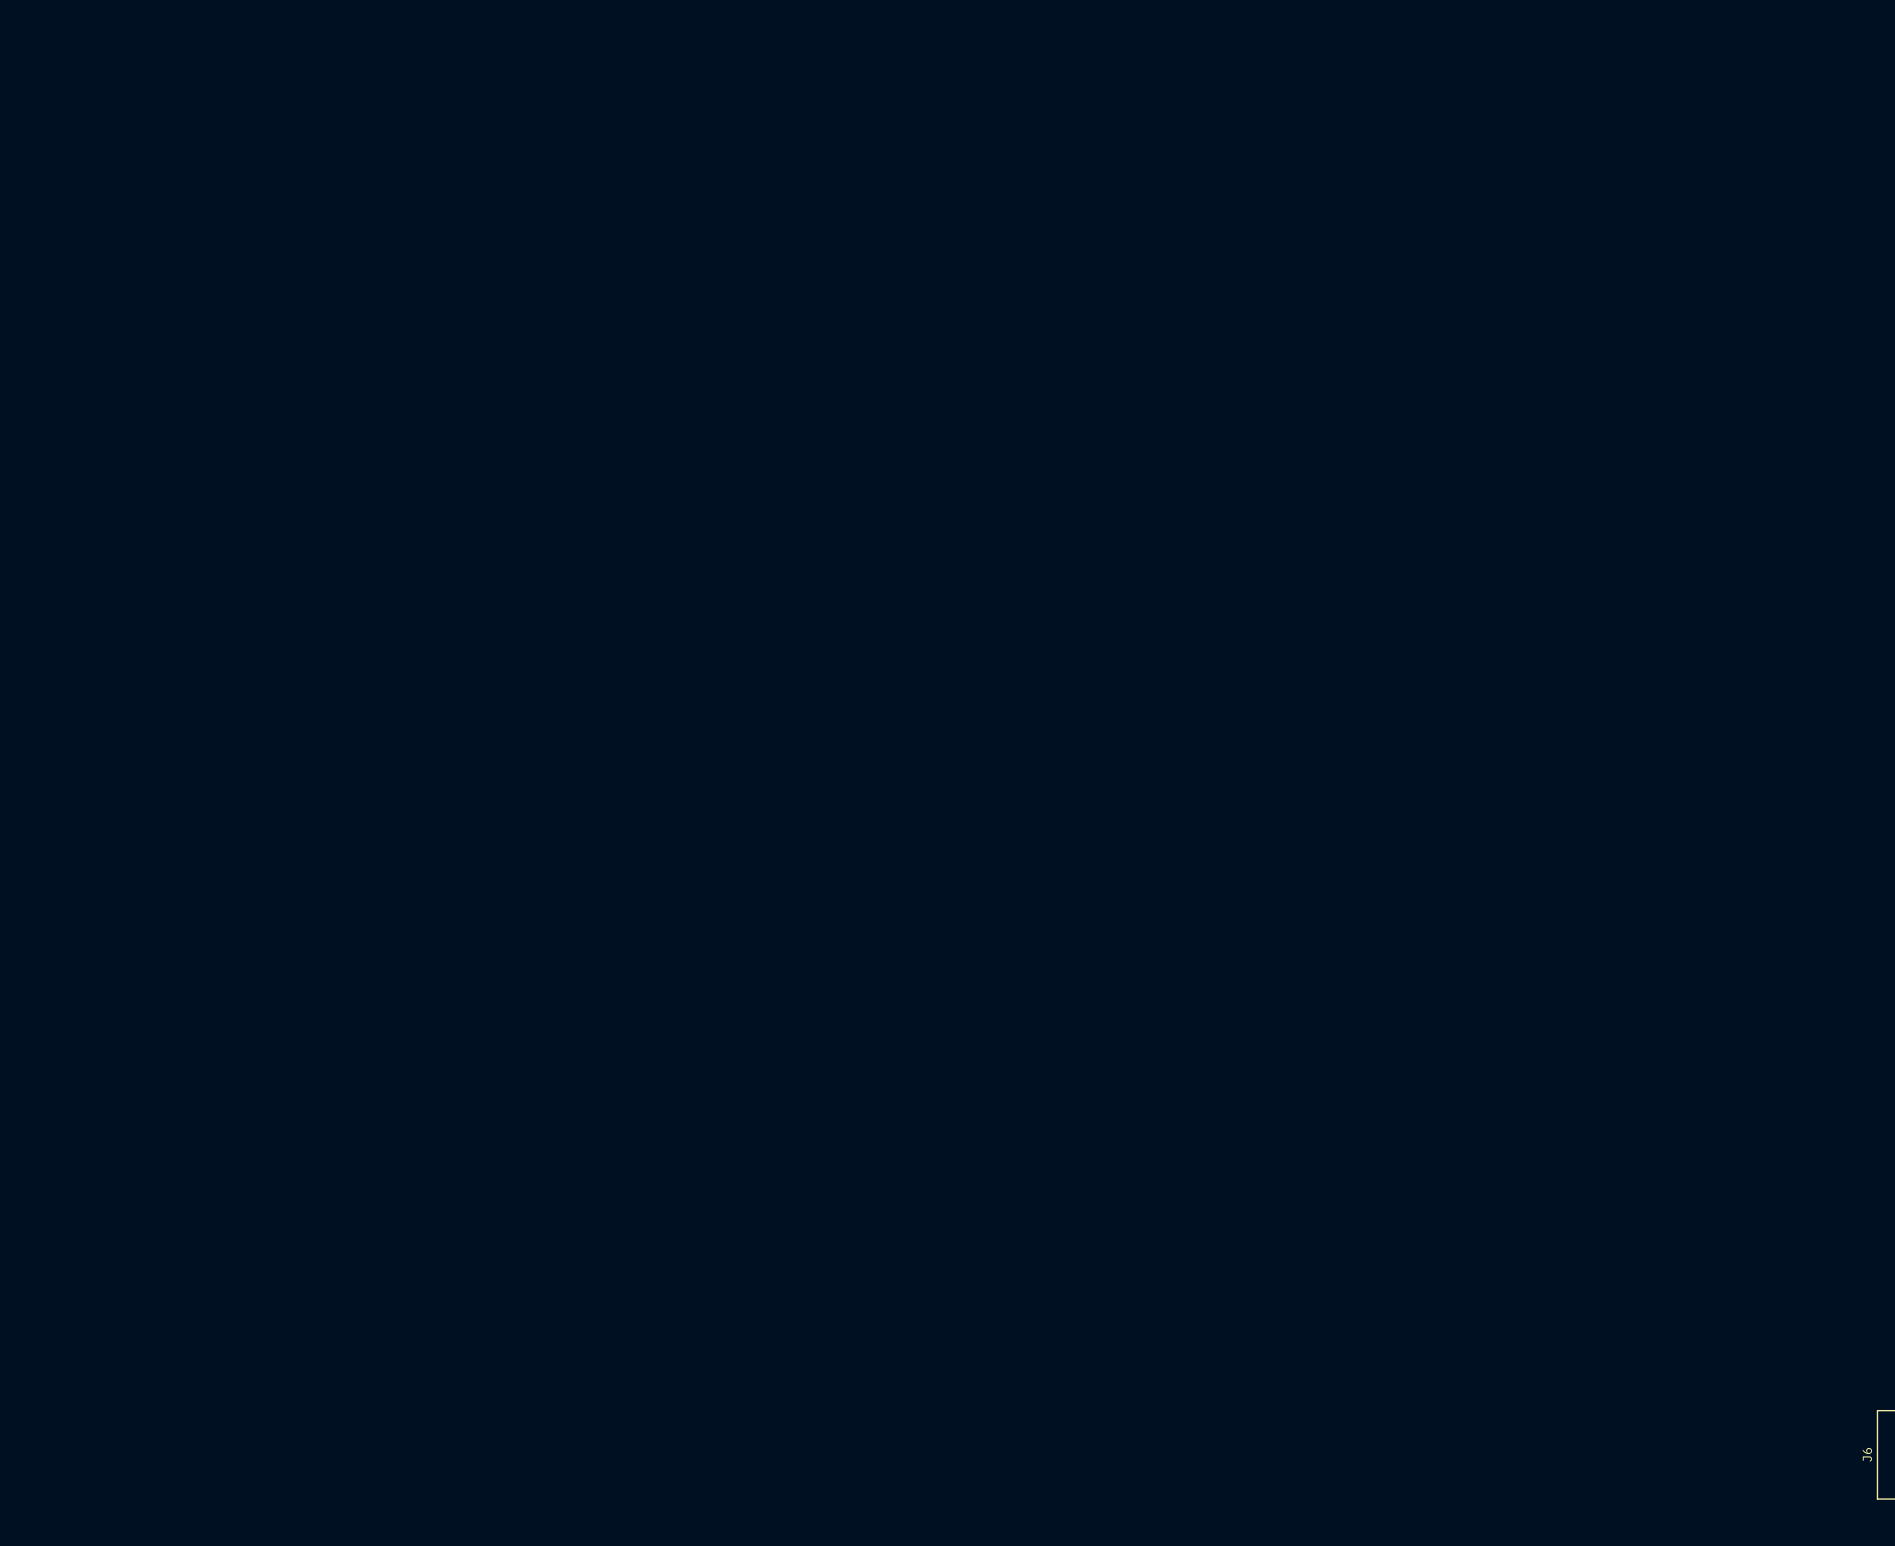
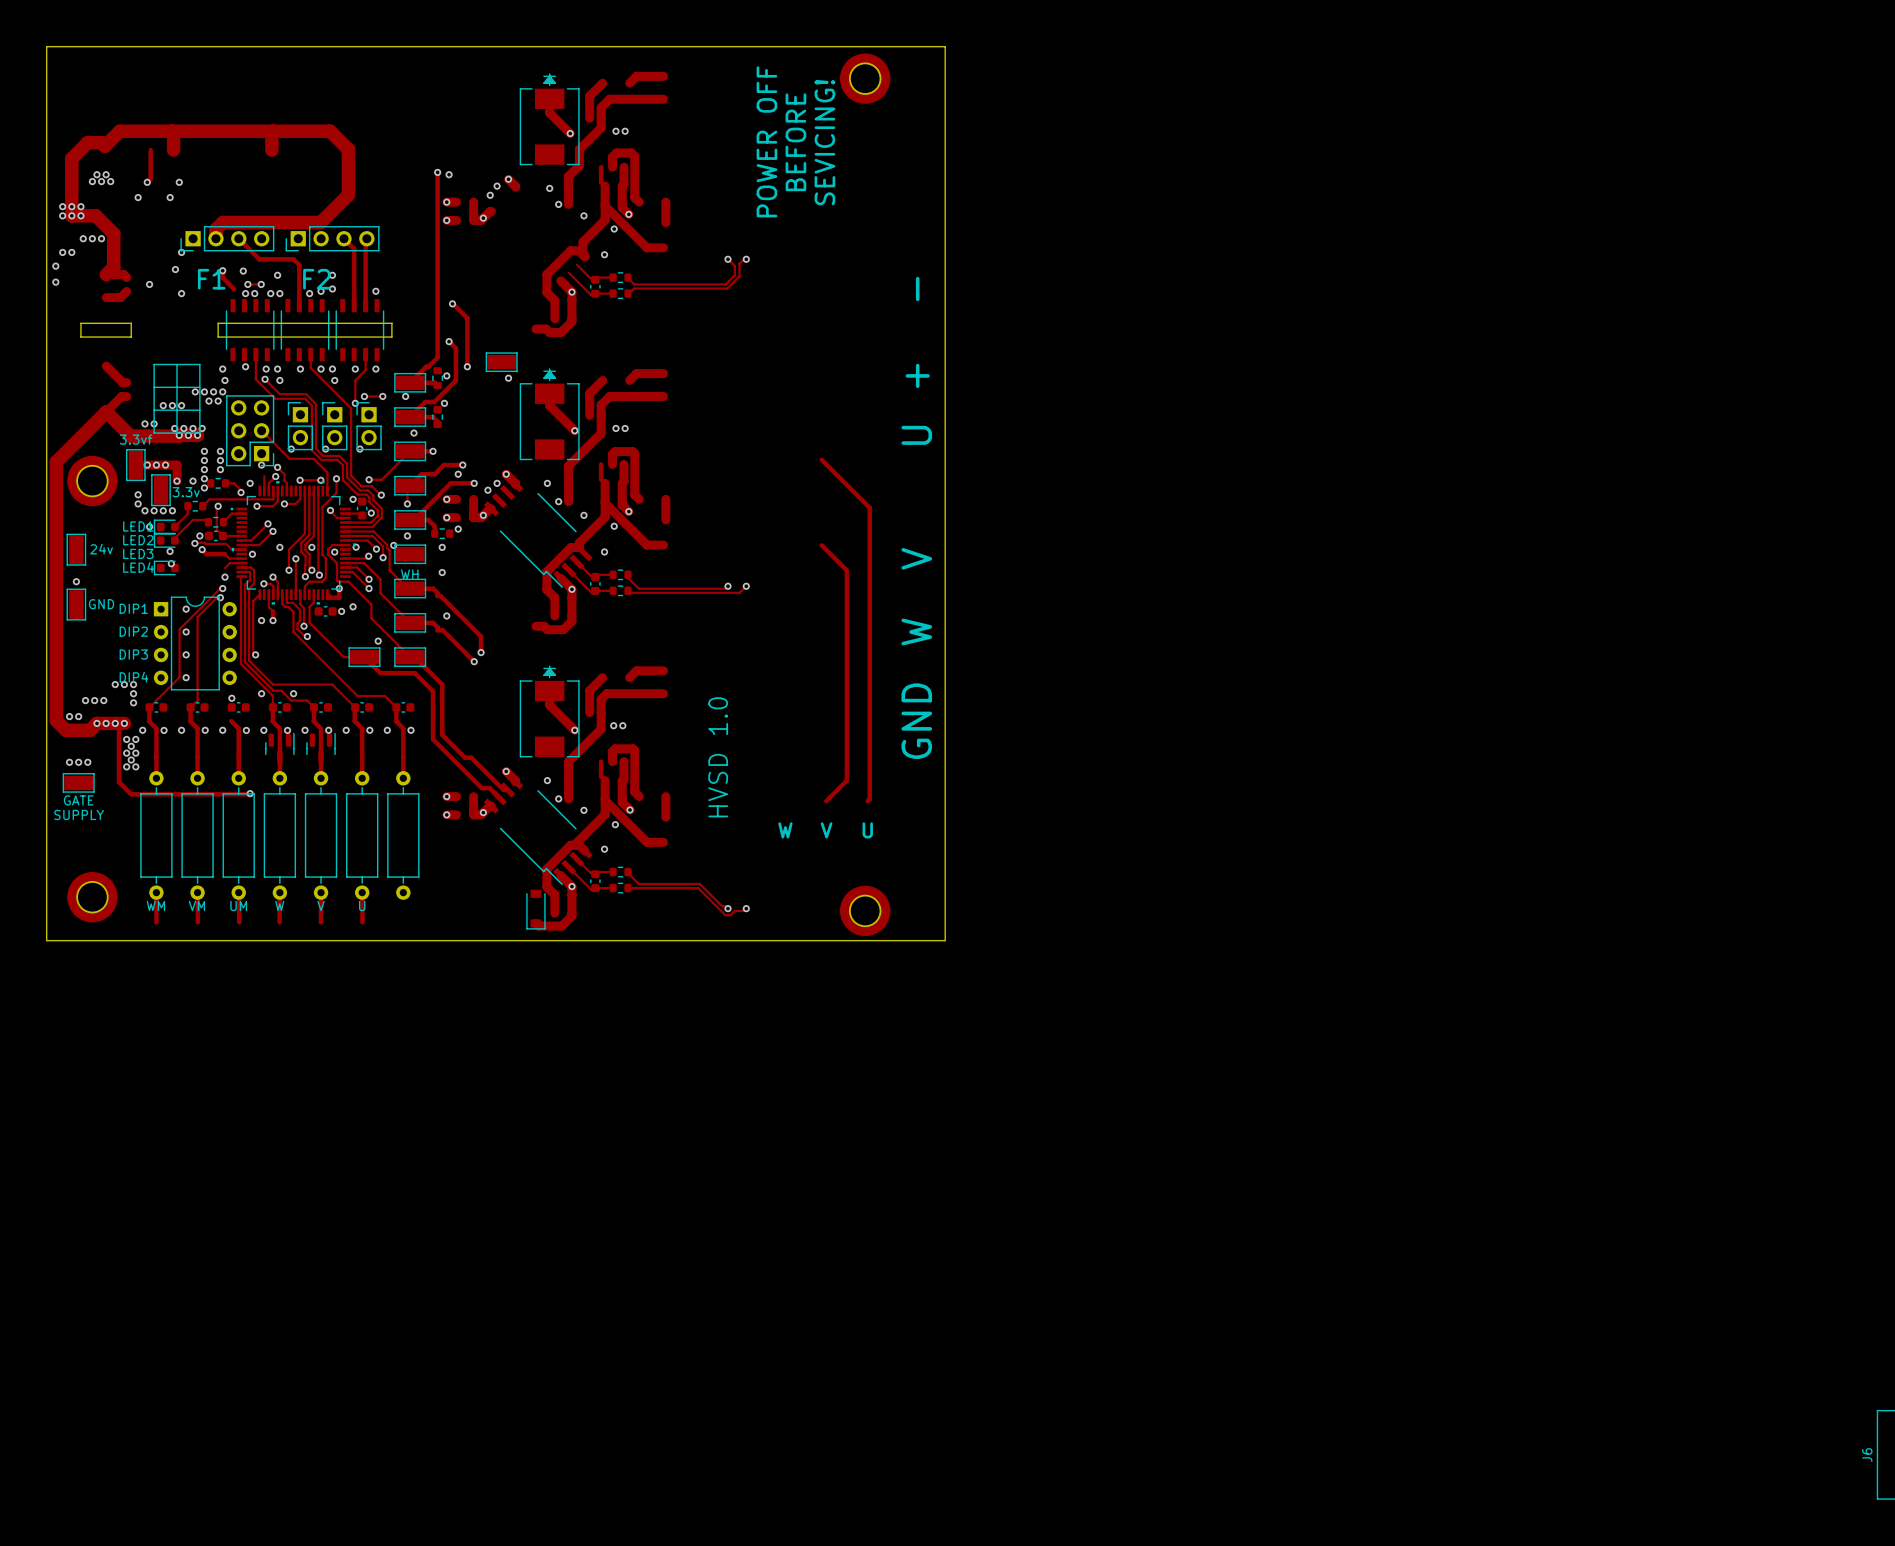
board edge: none -> (46, 46) (945, 46) (945, 940) (46, 940) (46, 46)
track: none -> (663, 76) (636, 76) (629, 83)
part: none -> (865, 78)
track: none -> (602, 83) (589, 96) (589, 118)
track: none -> (549, 98) (549, 112) (570, 133)
track: none -> (663, 99) (609, 99) (601, 107) (601, 127) (579, 149) (579, 165) (568, 176) (568, 204)
part: none -> (549, 119)
track: none -> (172, 131) (173, 150)
track: none -> (273, 131) (271, 150)
via: none -> (615, 131)
via: none -> (625, 131)
via: none -> (570, 133)
text: none -> POWER OFF (766, 141)
text: none -> BEFORE (795, 142)
text: none -> SEVICING! (824, 142)
track: none -> (150, 150) (150, 178) (147, 182)
track: none -> (601, 167) (601, 182) (605, 186) (605, 219) (583, 242) (583, 254)
track: none -> (612, 167) (612, 156) (616, 152) (631, 152) (634, 156) (634, 197) (639, 202)
track: none -> (623, 167) (622, 207) (628, 214)
track: none -> (437, 172) (437, 357) (410, 382) (434, 382) (437, 385)
via: none -> (437, 172)
via: none -> (96, 174)
via: none -> (106, 174)
via: none -> (449, 174)
track: none -> (508, 179) (515, 187)
via: none -> (508, 179)
via: none -> (92, 181)
via: none -> (101, 181)
via: none -> (110, 181)
via: none -> (147, 182)
via: none -> (179, 182)
via: none -> (497, 186)
via: none -> (549, 188)
via: none -> (490, 195)
via: none -> (138, 197)
via: none -> (170, 197)
track: none -> (446, 202) (456, 202)
via: none -> (446, 202)
track: none -> (473, 202) (473, 220) (481, 220) (491, 211)
track: none -> (665, 202) (665, 222)
via: none -> (558, 204)
track: none -> (605, 205) (647, 247) (663, 247)
via: none -> (62, 206)
via: none -> (71, 206)
via: none -> (80, 206)
via: none -> (628, 214)
via: none -> (62, 215)
via: none -> (71, 215)
via: none -> (80, 215)
via: none -> (583, 215)
via: none -> (483, 218)
track: none -> (446, 220) (456, 220)
via: none -> (446, 220)
via: none -> (614, 229)
via: none -> (83, 238)
via: none -> (92, 238)
via: none -> (101, 238)
track: none -> (215, 238) (215, 229) (222, 222) (320, 222) (348, 194) (348, 149) (330, 131) (119, 131) (104, 146) (101, 142) (87, 142) (71, 158) (71, 215) (95, 215) (113, 233) (113, 267) (106, 274) (123, 274) (126, 277)
part: none -> (227, 238)
track: none -> (238, 238) (259, 259) (293, 259) (299, 265) (299, 305)
part: none -> (332, 238)
track: none -> (343, 238) (354, 248) (354, 305)
track: none -> (365, 239) (365, 305)
via: none -> (62, 252)
via: none -> (71, 252)
via: none -> (181, 252)
via: none -> (604, 254)
track: none -> (585, 256) (579, 250) (570, 250) (546, 274) (546, 292) (554, 300) (554, 318)
track: none -> (728, 259) (734, 266) (734, 275) (725, 284) (634, 284) (629, 279)
via: none -> (728, 259)
track: none -> (746, 259) (739, 263) (739, 276) (727, 288) (634, 288) (629, 293)
via: none -> (746, 259)
track: none -> (576, 264) (590, 278) (595, 278)
via: none -> (55, 266)
via: none -> (175, 269)
track: none -> (222, 270) (222, 277) (234, 289)
via: none -> (222, 270)
via: none -> (243, 271)
track: none -> (568, 272) (591, 295) (595, 295)
via: none -> (277, 275)
via: none -> (332, 275)
track: none -> (612, 275) (609, 277) (595, 277)
part: none -> (620, 277)
text: none -> F1 (211, 279)
text: none -> F2 (316, 279)
track: none -> (560, 280) (571, 292) (571, 321) (561, 332) (549, 332) (546, 329) (535, 329)
via: none -> (55, 282)
via: none -> (149, 284)
track: none -> (247, 284) (261, 284)
via: none -> (247, 284)
via: none -> (261, 284)
part: none -> (595, 286)
via: none -> (332, 289)
text: none -> - (917, 289)
track: none -> (126, 291) (120, 297) (106, 297)
via: none -> (321, 291)
via: none -> (375, 291)
via: none -> (571, 292)
via: none -> (181, 293)
via: none -> (245, 293)
via: none -> (254, 293)
via: none -> (270, 293)
via: none -> (279, 293)
via: none -> (309, 293)
track: none -> (597, 293) (612, 293)
part: none -> (620, 293)
track: none -> (452, 303) (467, 318) (467, 366)
via: none -> (452, 303)
board edge: none -> (80, 323) (131, 323) (131, 337) (80, 337) (80, 323)
board edge: none -> (218, 323) (391, 323) (391, 337) (218, 337) (218, 323)
part: none -> (250, 330)
part: none -> (305, 330)
part: none -> (359, 330)
track: none -> (449, 341) (455, 348) (455, 380) (434, 401) (425, 401) (410, 417) (433, 417) (437, 424)
via: none -> (449, 341)
track: none -> (255, 354) (255, 379) (275, 398) (305, 398) (311, 405) (311, 450) (321, 459) (337, 459) (343, 465) (343, 480) (357, 494) (366, 494) (369, 497) (369, 501) (377, 510) (377, 515) (371, 522) (345, 522)
track: none -> (310, 354) (310, 367) (351, 408) (351, 475) (361, 486) (371, 486) (381, 495)
track: none -> (365, 354) (365, 370) (355, 380) (355, 403)
part: none -> (501, 362)
line: none -> (154, 364) (199, 364) (199, 433) (154, 433) (154, 364)
line: none -> (176, 364) (176, 433)
track: none -> (106, 366) (122, 382) (126, 382)
via: none -> (245, 366)
via: none -> (467, 366)
via: none -> (222, 369)
via: none -> (266, 369)
via: none -> (277, 369)
via: none -> (300, 369)
via: none -> (321, 369)
via: none -> (332, 369)
via: none -> (355, 369)
via: none -> (375, 369)
track: none -> (663, 373) (636, 373) (629, 380)
via: none -> (446, 375)
text: none -> + (917, 375)
part: none -> (437, 378)
via: none -> (508, 378)
track: none -> (265, 379) (279, 394) (306, 394) (315, 403) (315, 448) (323, 455) (339, 455) (347, 463) (347, 477) (360, 490) (368, 490) (373, 495) (373, 500) (381, 508) (381, 517) (372, 527) (345, 527)
via: none -> (265, 379)
via: none -> (225, 380)
via: none -> (279, 380)
via: none -> (334, 380)
track: none -> (602, 380) (589, 393) (589, 415)
part: none -> (410, 382)
line: none -> (154, 387) (199, 387)
via: none -> (195, 391)
via: none -> (204, 391)
via: none -> (213, 391)
via: none -> (222, 391)
track: none -> (549, 393) (549, 405) (574, 430)
track: none -> (126, 396) (121, 396) (106, 411)
track: none -> (364, 396) (382, 396)
via: none -> (364, 396)
via: none -> (382, 396)
via: none -> (405, 396)
track: none -> (663, 396) (609, 396) (601, 405) (601, 433) (568, 466) (568, 501)
via: none -> (209, 401)
via: none -> (218, 401)
via: none -> (355, 403)
via: none -> (444, 403)
via: none -> (163, 405)
via: none -> (172, 405)
via: none -> (181, 405)
line: none -> (154, 410) (199, 410)
track: none -> (106, 411) (56, 461) (56, 720) (66, 730) (90, 730) (96, 723) (124, 723) (119, 728) (119, 782) (131, 794) (250, 793)
track: none -> (106, 411) (130, 436) (197, 435)
part: none -> (549, 414)
part: none -> (410, 417)
part: none -> (437, 417)
via: none -> (144, 423)
via: none -> (154, 423)
part: none -> (300, 426)
part: none -> (334, 426)
part: none -> (369, 426)
via: none -> (174, 428)
via: none -> (183, 428)
via: none -> (192, 428)
via: none -> (202, 428)
via: none -> (615, 428)
via: none -> (625, 428)
part: none -> (250, 430)
track: none -> (261, 430) (289, 458) (313, 458) (327, 472) (327, 491)
via: none -> (574, 430)
via: none -> (413, 433)
via: none -> (179, 435)
via: none -> (188, 435)
via: none -> (197, 435)
text: none -> U (916, 435)
text: none -> 3.3vf (136, 439)
via: none -> (291, 449)
via: none -> (325, 449)
via: none -> (359, 449)
via: none -> (204, 451)
via: none -> (220, 451)
part: none -> (410, 451)
track: none -> (433, 451) (410, 451) (381, 479) (369, 479)
via: none -> (433, 451)
track: none -> (821, 459) (869, 507) (869, 799) (867, 801)
via: none -> (204, 460)
via: none -> (220, 460)
track: none -> (601, 464) (601, 479) (605, 483) (605, 517) (579, 542) (579, 547) (571, 547) (546, 571) (546, 589) (554, 597) (554, 615)
track: none -> (612, 464) (612, 454) (615, 451) (632, 451) (634, 453) (634, 494) (639, 499)
track: none -> (623, 464) (622, 505) (628, 511)
track: none -> (135, 465) (176, 465) (176, 481)
part: none -> (135, 465)
via: none -> (147, 465)
via: none -> (156, 465)
via: none -> (165, 465)
via: none -> (261, 465)
track: none -> (462, 465) (443, 465) (434, 474) (421, 474) (410, 485)
via: none -> (462, 465)
track: none -> (277, 467) (284, 474) (286, 491)
via: none -> (277, 467)
via: none -> (204, 469)
via: none -> (220, 469)
via: none -> (458, 474)
track: none -> (506, 474) (515, 484)
via: none -> (506, 474)
track: none -> (264, 476) (264, 491)
track: none -> (275, 476) (268, 483) (268, 491)
via: none -> (275, 476)
via: none -> (204, 478)
track: none -> (336, 478) (336, 493) (322, 507) (322, 554) (325, 558) (325, 577) (322, 581) (309, 581) (304, 586) (304, 594)
via: none -> (336, 478)
via: none -> (369, 479)
track: none -> (300, 480) (320, 480)
via: none -> (300, 480)
via: none -> (320, 480)
part: none -> (92, 481)
via: none -> (176, 481)
via: none -> (192, 481)
part: none -> (218, 483)
track: none -> (225, 483) (234, 483) (241, 492)
via: none -> (250, 483)
track: none -> (474, 483) (450, 483) (414, 519)
via: none -> (474, 483)
via: none -> (497, 483)
via: none -> (547, 483)
part: none -> (410, 485)
via: none -> (204, 487)
track: none -> (407, 488) (407, 503)
part: none -> (160, 490)
via: none -> (487, 490)
track: none -> (273, 491) (273, 499) (209, 499) (202, 506)
track: none -> (277, 491) (277, 501) (273, 506) (257, 506)
track: none -> (300, 491) (300, 499) (295, 503) (284, 503)
track: none -> (304, 491) (304, 533) (289, 549) (289, 570)
track: none -> (309, 491) (309, 534) (301, 543) (301, 551) (305, 556) (305, 576)
track: none -> (313, 491) (313, 536) (305, 544) (305, 550) (309, 554) (309, 567) (311, 570)
track: none -> (318, 491) (319, 575)
text: none -> 3.3v (186, 492)
via: none -> (241, 492)
via: none -> (138, 494)
via: none -> (381, 495)
via: none -> (353, 499)
track: none -> (446, 499) (456, 499)
via: none -> (446, 499)
track: none -> (473, 499) (473, 517) (481, 517) (491, 508)
track: none -> (665, 499) (665, 519)
via: none -> (558, 501)
via: none -> (138, 503)
via: none -> (284, 503)
via: none -> (407, 503)
track: none -> (605, 503) (647, 545) (663, 545)
track: none -> (187, 506) (187, 513) (174, 526)
part: none -> (195, 506)
track: none -> (218, 506) (216, 529) (222, 535)
via: none -> (218, 506)
via: none -> (257, 506)
part: none -> (362, 508)
via: none -> (144, 510)
via: none -> (154, 510)
via: none -> (163, 510)
via: none -> (172, 510)
track: none -> (330, 510) (337, 518) (345, 518)
via: none -> (330, 510)
via: none -> (628, 511)
track: none -> (241, 513) (231, 513) (223, 522)
track: none -> (345, 513) (360, 513)
via: none -> (371, 513)
via: none -> (483, 515)
via: none -> (583, 515)
track: none -> (446, 517) (456, 517)
via: none -> (446, 517)
track: none -> (206, 519) (192, 519) (174, 538)
track: none -> (410, 519) (428, 519) (434, 526) (434, 533)
part: none -> (410, 519)
part: none -> (215, 522)
track: none -> (268, 523) (251, 540) (241, 540)
via: none -> (268, 523)
text: none -> LED1 (138, 526)
via: none -> (149, 526)
part: none -> (166, 526)
via: none -> (614, 526)
via: none -> (458, 529)
track: none -> (273, 531) (259, 545) (241, 545)
via: none -> (273, 531)
track: none -> (345, 531) (373, 531) (387, 544) (389, 550) (389, 570) (407, 588)
part: none -> (538, 532)
part: none -> (442, 533)
via: none -> (199, 535)
part: none -> (215, 535)
via: none -> (407, 535)
track: none -> (222, 536) (241, 536)
track: none -> (345, 536) (372, 536) (383, 546) (383, 557)
text: none -> LED2 (138, 540)
part: none -> (166, 540)
track: none -> (345, 540) (367, 540) (376, 549)
part: none -> (292, 542)
track: none -> (194, 543) (226, 543) (231, 549) (241, 549)
via: none -> (194, 543)
track: none -> (345, 545) (332, 545) (328, 549) (328, 554) (337, 563) (337, 580) (348, 581) (371, 604) (371, 618) (410, 657)
via: none -> (393, 545)
track: none -> (821, 545) (846, 570) (846, 780) (826, 801)
via: none -> (279, 547)
via: none -> (311, 547)
via: none -> (356, 547)
via: none -> (442, 547)
part: none -> (76, 549)
text: none -> 24v (101, 549)
track: none -> (202, 549) (206, 554) (225, 554) (229, 558) (241, 558)
via: none -> (202, 549)
via: none -> (376, 549)
via: none -> (170, 551)
via: none -> (604, 551)
via: none -> (334, 552)
text: none -> LED3 (138, 553)
via: none -> (252, 554)
part: none -> (410, 554)
track: none -> (368, 556) (366, 558) (345, 558)
via: none -> (368, 556)
via: none -> (383, 557)
track: none -> (295, 558) (295, 594)
via: none -> (295, 558)
text: none -> V (916, 558)
track: none -> (576, 562) (590, 575) (595, 575)
via: none -> (171, 563)
track: none -> (241, 563) (230, 563) (225, 568)
track: none -> (345, 563) (364, 563) (380, 579) (380, 593) (410, 622) (433, 622) (437, 630) (442, 630) (474, 661)
text: none -> LED4 (138, 567)
part: none -> (166, 567)
track: none -> (241, 567) (251, 567) (254, 570) (254, 583) (249, 588) (249, 660) (273, 684) (332, 684) (355, 707)
track: none -> (345, 567) (357, 567) (369, 579)
via: none -> (289, 570)
via: none -> (311, 570)
track: none -> (568, 570) (591, 592) (595, 592)
track: none -> (241, 572) (250, 572) (250, 579) (245, 584) (245, 662) (273, 690) (281, 690) (291, 700) (307, 700) (314, 707) (314, 720)
track: none -> (345, 572) (352, 572) (369, 588)
via: none -> (442, 572)
track: none -> (612, 572) (609, 574) (595, 574)
text: none -> WH (409, 574)
part: none -> (620, 574)
track: none -> (627, 574) (627, 577) (638, 588) (725, 588) (728, 586)
via: none -> (319, 575)
track: none -> (241, 576) (241, 663) (272, 695) (272, 720)
via: none -> (305, 576)
via: none -> (225, 577)
track: none -> (273, 577) (277, 581) (277, 594)
via: none -> (273, 577)
track: none -> (560, 578) (571, 589) (571, 621) (563, 629) (547, 629) (543, 626) (535, 626)
via: none -> (369, 579)
via: none -> (76, 581)
track: none -> (263, 583) (270, 583) (273, 586) (273, 594)
via: none -> (263, 583)
part: none -> (595, 583)
via: none -> (728, 586)
track: none -> (746, 586) (739, 592) (629, 592) (627, 590)
via: none -> (746, 586)
track: none -> (222, 588) (220, 588) (179, 629) (179, 677) (149, 707) (149, 720)
via: none -> (222, 588)
track: none -> (339, 588) (339, 597) (330, 597) (328, 594)
via: none -> (339, 588)
via: none -> (369, 588)
track: none -> (410, 588) (433, 588) (437, 595) (440, 595) (481, 636) (481, 652)
part: none -> (410, 588)
via: none -> (571, 589)
track: none -> (597, 590) (612, 590)
part: none -> (620, 590)
track: none -> (259, 594) (253, 601) (253, 652) (255, 654)
track: none -> (268, 594) (268, 607) (273, 611) (273, 620)
track: none -> (282, 594) (282, 603) (293, 611) (293, 631) (357, 696) (384, 696) (396, 707) (396, 720)
track: none -> (286, 594) (286, 602) (293, 602) (299, 609) (297, 629) (307, 636)
track: none -> (300, 594) (300, 604) (304, 608) (304, 626)
track: none -> (313, 594) (313, 602) (309, 606) (309, 622) (343, 657) (364, 657) (380, 673) (414, 673) (433, 691) (433, 739) (481, 788) (489, 788) (499, 797)
track: none -> (220, 597) (216, 597) (197, 617) (197, 700) (190, 707) (190, 720)
via: none -> (220, 597)
part: none -> (76, 604)
text: none -> GND (101, 604)
via: none -> (353, 606)
text: none -> DIP1 (133, 608)
via: none -> (186, 609)
part: none -> (325, 611)
via: none -> (341, 611)
via: none -> (446, 615)
via: none -> (261, 620)
via: none -> (273, 620)
part: none -> (410, 622)
via: none -> (304, 626)
text: none -> DIP2 (133, 631)
via: none -> (186, 631)
text: none -> W (916, 631)
via: none -> (307, 636)
via: none -> (378, 641)
part: none -> (195, 643)
via: none -> (481, 652)
text: none -> DIP3 (133, 654)
via: none -> (186, 654)
via: none -> (255, 654)
part: none -> (364, 657)
part: none -> (410, 657)
track: none -> (414, 657) (442, 684) (442, 734) (465, 757) (471, 757) (503, 789) (507, 789)
via: none -> (474, 661)
track: none -> (663, 670) (636, 670) (629, 677)
text: none -> DIP4 (133, 677)
via: none -> (186, 677)
track: none -> (602, 677) (589, 690) (589, 712)
via: none -> (115, 684)
via: none -> (124, 684)
via: none -> (133, 684)
track: none -> (549, 690) (549, 705) (574, 730)
via: none -> (133, 693)
via: none -> (261, 693)
via: none -> (293, 693)
track: none -> (663, 693) (606, 693) (601, 699) (601, 729) (568, 761) (568, 798)
via: none -> (231, 698)
via: none -> (85, 700)
via: none -> (94, 700)
via: none -> (103, 700)
via: none -> (133, 702)
part: none -> (156, 707)
part: none -> (197, 707)
part: none -> (238, 707)
part: none -> (279, 707)
part: none -> (321, 707)
track: none -> (354, 707) (354, 721) (362, 728) (362, 778)
part: none -> (362, 707)
part: none -> (403, 707)
part: none -> (549, 711)
via: none -> (69, 716)
via: none -> (78, 716)
track: none -> (148, 721) (156, 728) (156, 778)
track: none -> (190, 721) (197, 728) (197, 778)
track: none -> (231, 721) (238, 728) (238, 778)
track: none -> (272, 721) (279, 728) (279, 778)
track: none -> (313, 721) (321, 728) (321, 778)
track: none -> (395, 721) (403, 728) (403, 778)
text: none -> GND (916, 721)
via: none -> (96, 723)
via: none -> (106, 723)
via: none -> (115, 723)
via: none -> (124, 723)
via: none -> (613, 725)
via: none -> (622, 725)
via: none -> (142, 730)
via: none -> (164, 730)
via: none -> (181, 730)
via: none -> (205, 730)
via: none -> (222, 730)
via: none -> (246, 730)
via: none -> (263, 730)
via: none -> (287, 730)
via: none -> (305, 730)
via: none -> (328, 730)
via: none -> (346, 730)
via: none -> (369, 730)
via: none -> (387, 730)
via: none -> (410, 730)
via: none -> (574, 730)
via: none -> (126, 739)
via: none -> (135, 739)
via: none -> (131, 746)
part: none -> (279, 748)
part: none -> (321, 748)
via: none -> (126, 753)
via: none -> (135, 753)
text: none -> HVSD 1.0 (718, 757)
via: none -> (131, 760)
track: none -> (601, 761) (601, 776) (605, 780) (605, 814) (574, 845)
track: none -> (612, 761) (612, 751) (615, 748) (632, 748) (634, 750) (634, 792) (639, 796)
track: none -> (623, 761) (622, 802) (630, 810)
via: none -> (69, 762)
via: none -> (78, 762)
via: none -> (87, 762)
via: none -> (126, 766)
via: none -> (135, 766)
track: none -> (506, 771) (515, 781)
via: none -> (506, 771)
via: none -> (547, 780)
part: none -> (78, 782)
via: none -> (250, 793)
track: none -> (446, 796) (456, 796)
via: none -> (446, 796)
track: none -> (473, 796) (473, 814) (481, 814) (491, 806)
track: none -> (665, 796) (665, 817)
via: none -> (558, 798)
text: none -> GATE (78, 800)
track: none -> (605, 800) (647, 842) (663, 842)
via: none -> (583, 810)
via: none -> (630, 810)
via: none -> (483, 812)
text: none -> SUPPLY (79, 814)
track: none -> (446, 814) (456, 814)
via: none -> (446, 814)
via: none -> (615, 824)
part: none -> (538, 829)
text: none -> W (785, 830)
text: none -> V (826, 830)
text: none -> U (867, 830)
part: none -> (156, 835)
part: none -> (197, 835)
part: none -> (238, 835)
part: none -> (279, 835)
part: none -> (321, 835)
part: none -> (362, 835)
part: none -> (403, 835)
via: none -> (604, 849)
track: none -> (585, 851) (579, 845) (570, 845) (546, 869) (546, 886) (554, 894) (554, 913)
track: none -> (576, 859) (590, 872) (595, 872)
track: none -> (568, 867) (591, 889) (595, 889)
track: none -> (612, 869) (609, 872) (595, 872)
part: none -> (620, 872)
track: none -> (627, 872) (638, 884) (699, 884) (722, 906) (728, 908)
track: none -> (560, 875) (571, 886) (571, 916) (561, 926) (538, 926) (535, 923)
part: none -> (595, 881)
via: none -> (571, 886)
track: none -> (597, 888) (612, 888)
part: none -> (620, 888)
track: none -> (627, 888) (698, 888) (725, 915) (730, 915) (734, 910) (744, 910) (746, 908)
track: none -> (156, 892) (156, 922)
track: none -> (197, 892) (197, 922)
track: none -> (279, 892) (279, 922)
track: none -> (321, 892) (321, 922)
track: none -> (362, 892) (362, 922)
track: none -> (239, 893) (239, 922)
part: none -> (92, 897)
text: none -> WM (155, 905)
text: none -> W (279, 905)
text: none -> VM (196, 906)
text: none -> UM (238, 906)
text: none -> V (321, 906)
text: none -> U (362, 906)
via: none -> (728, 908)
via: none -> (746, 908)
part: none -> (535, 909)
part: none -> (865, 910)

